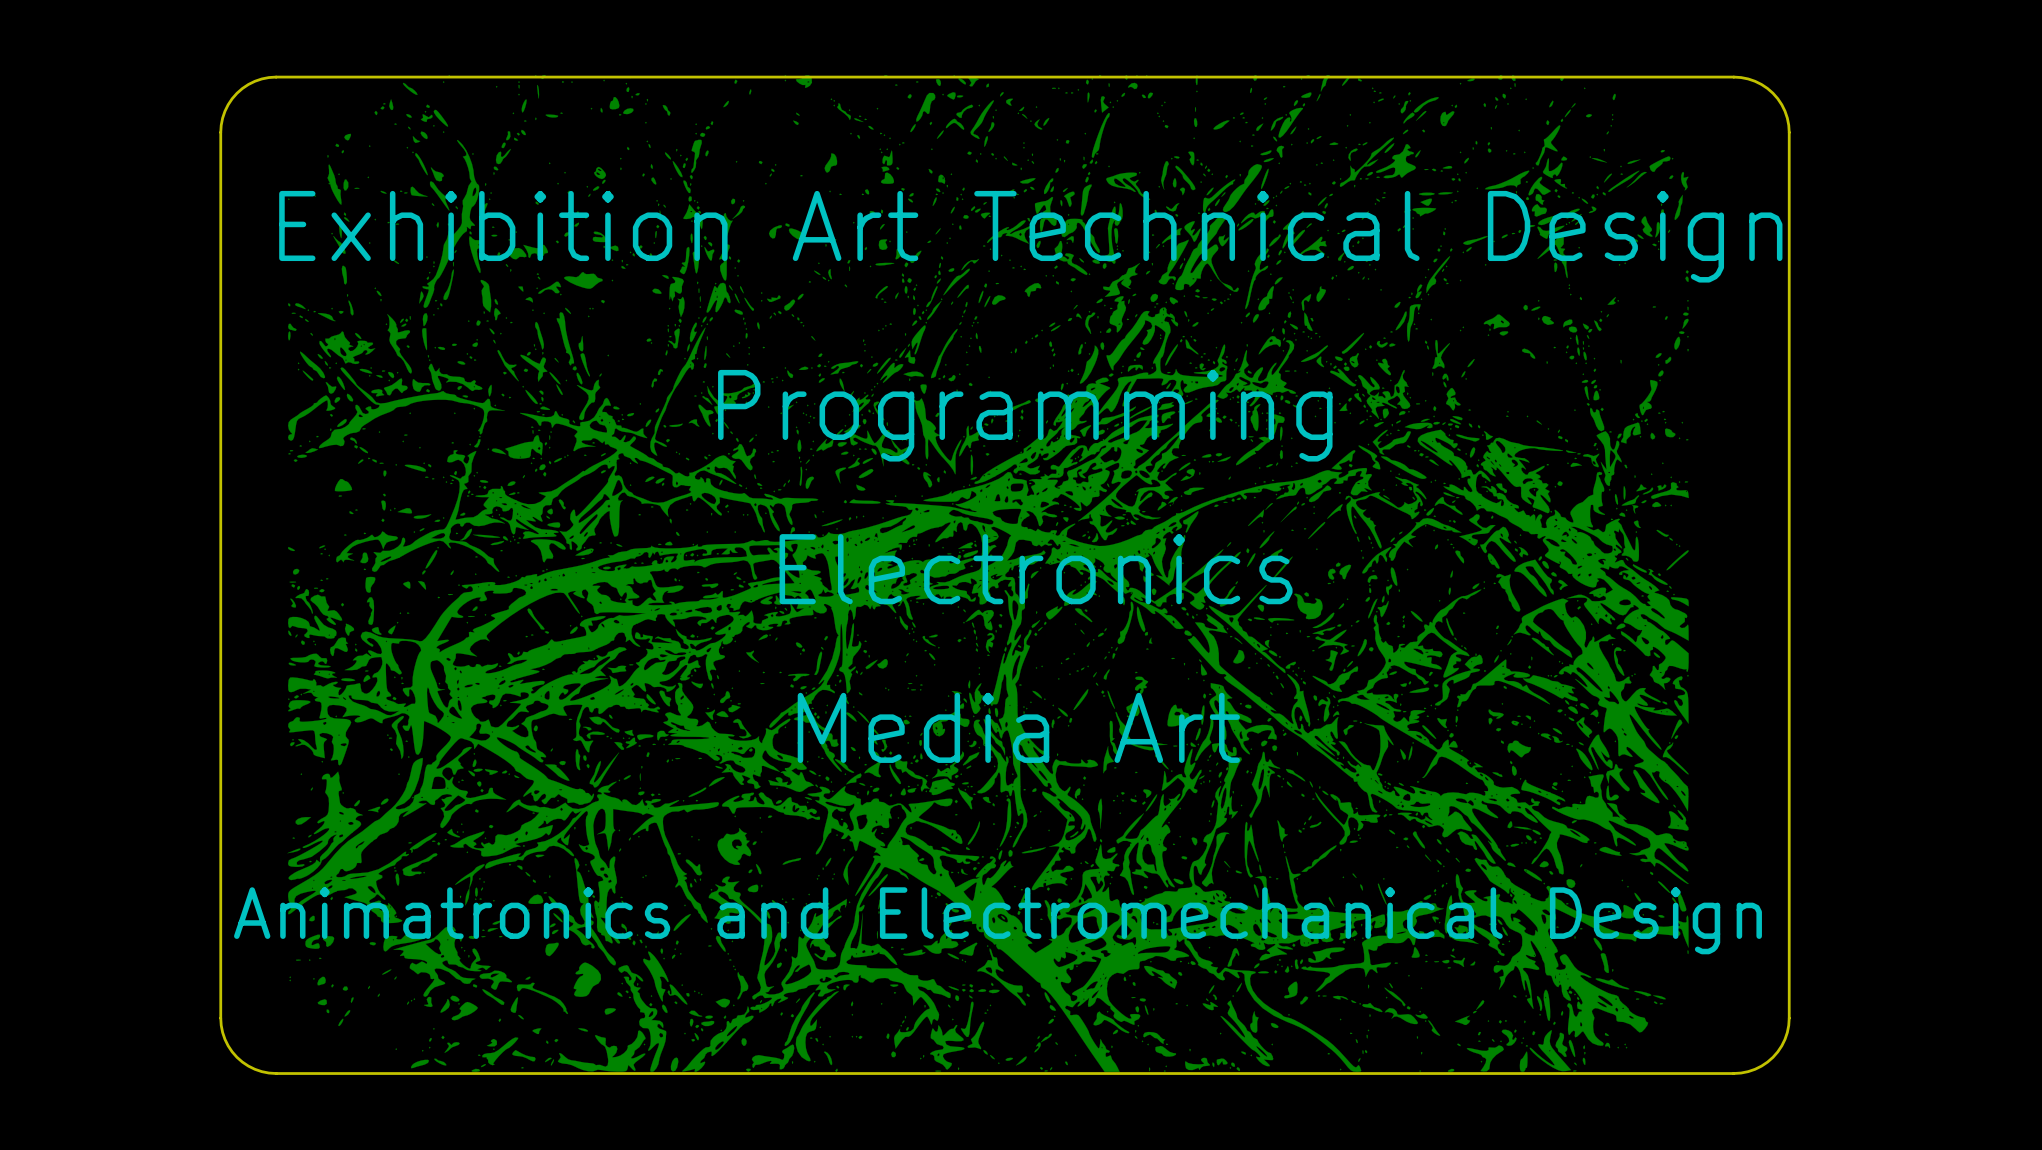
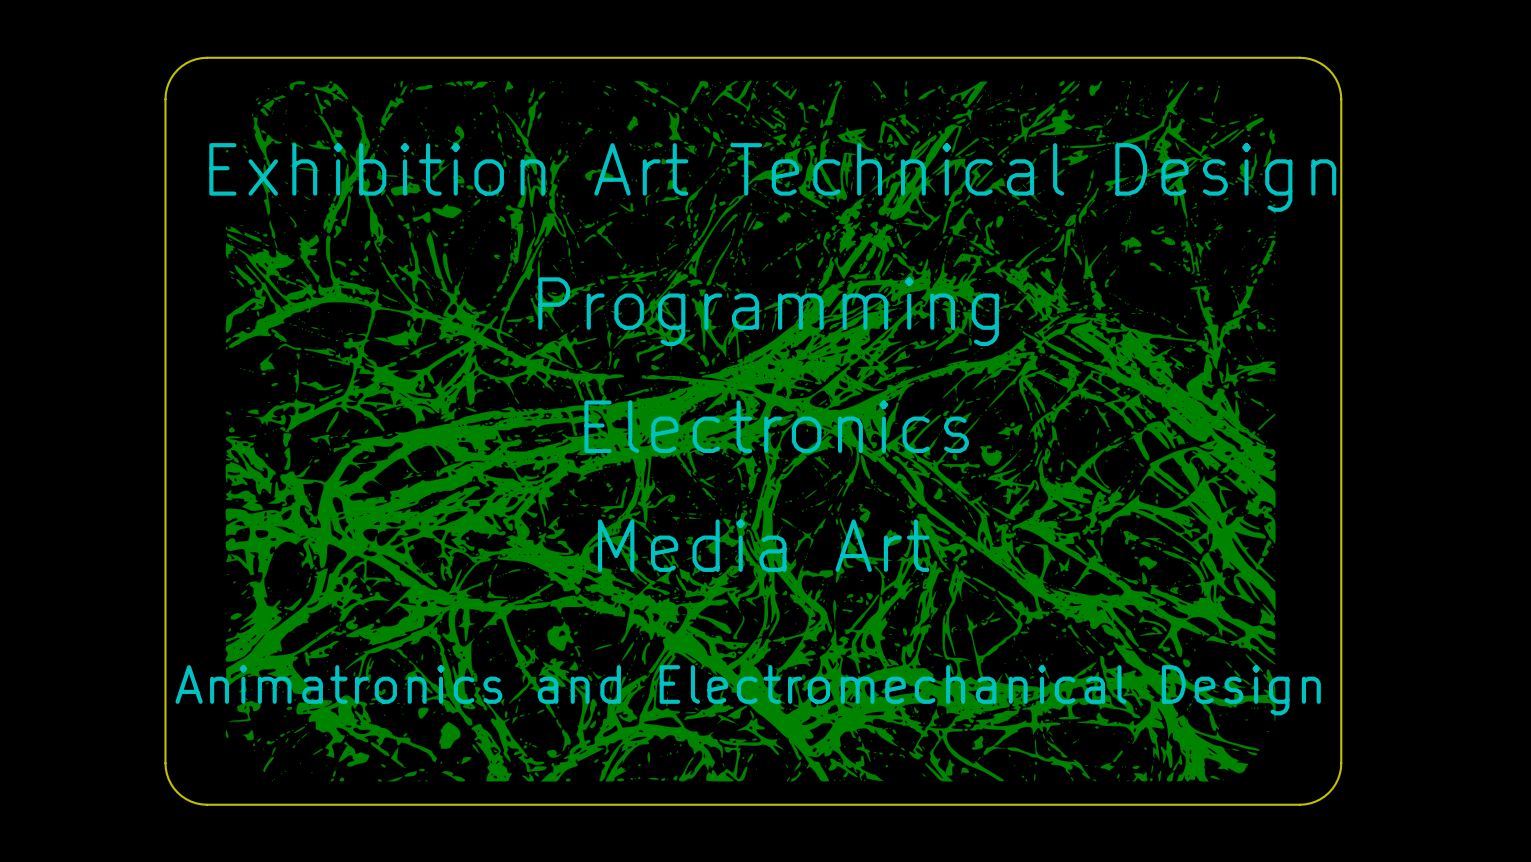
drawing shape: [287, 74, 1689, 1072] -> [225, 80, 1276, 782]

